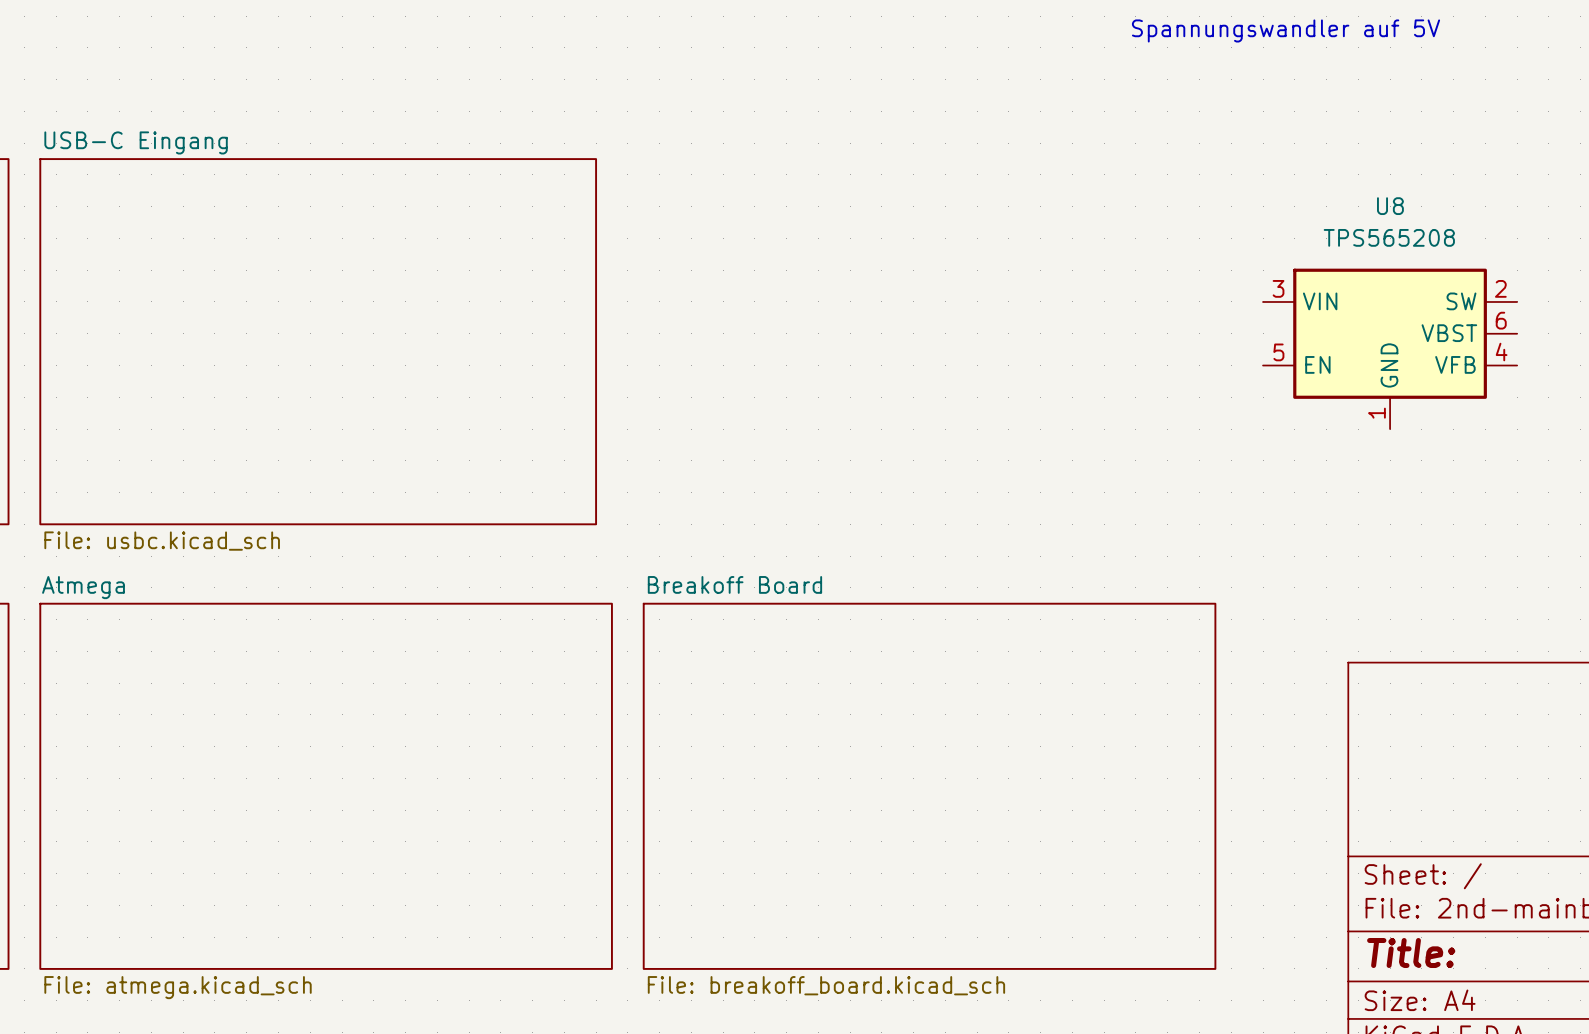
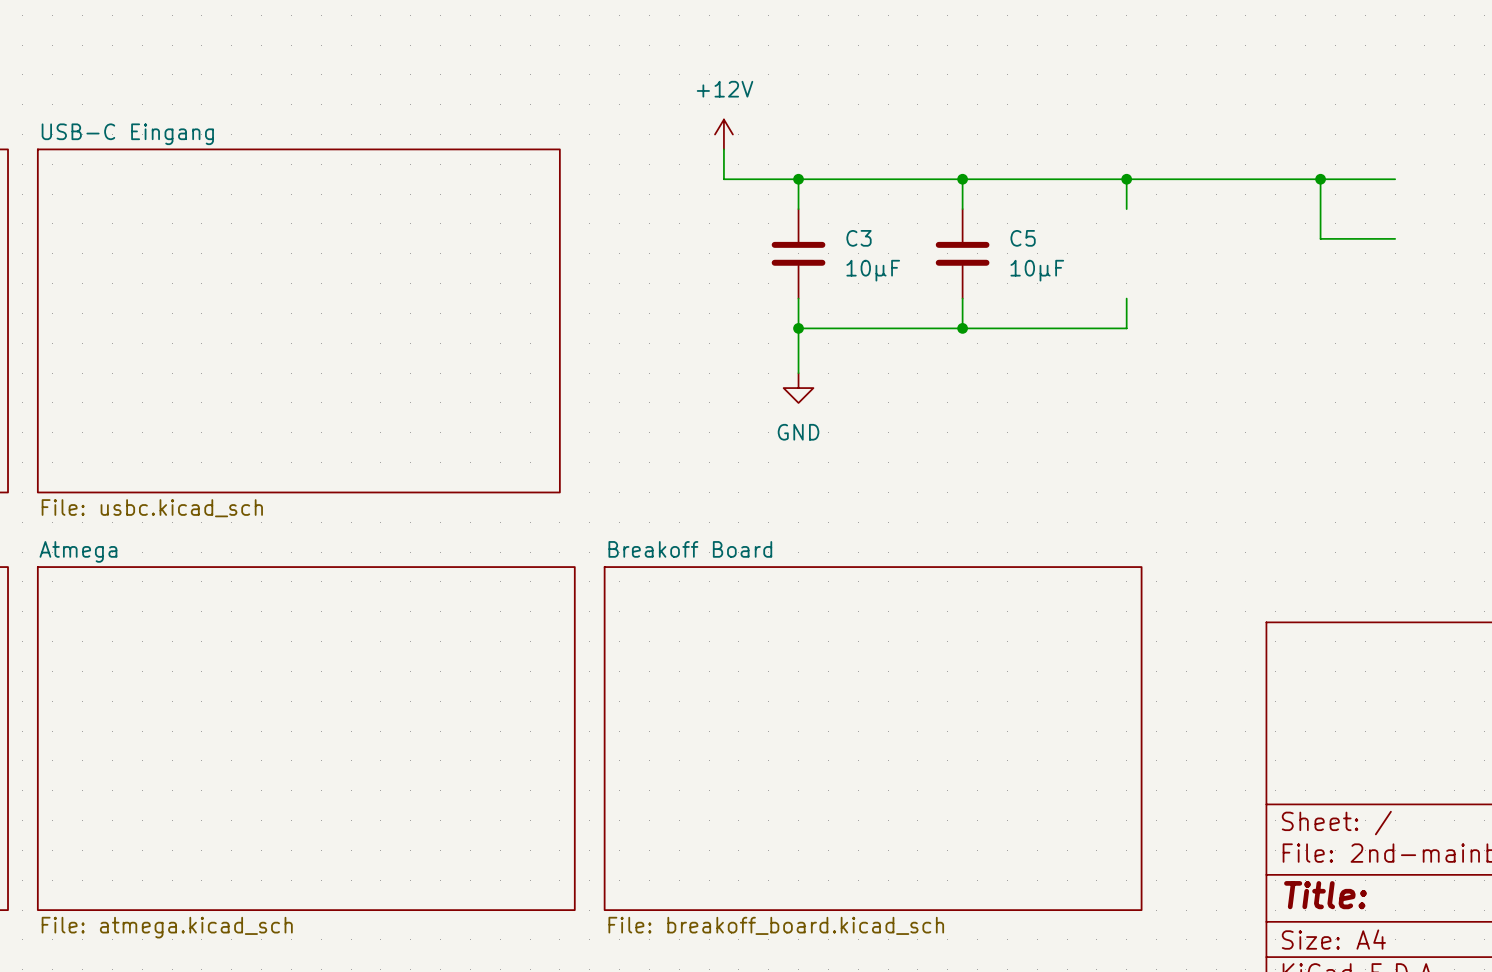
text: Spannungswandler auf 5V (1286, 30) -> none
power symbol: none -> +12V (723, 134)
wire: none -> (723, 149) (723, 179) (1395, 179)
wire: none -> (798, 179) (798, 209)
junction: none -> (798, 179)
wire: none -> (962, 179) (962, 209)
junction: none -> (962, 179)
wire: none -> (1126, 179) (1126, 209)
junction: none -> (1126, 179)
wire: none -> (1320, 179) (1320, 238) (1395, 238)
junction: none -> (1320, 179)
C3: none -> 10µF (798, 253)
C5: none -> 10µF (962, 253)
wire: none -> (798, 298) (798, 373)
wire: none -> (962, 298) (962, 328)
wire: none -> (1126, 298) (1126, 328) (798, 328)
U8: TPS565208 (1390, 348) -> none
junction: none -> (798, 328)
junction: none -> (962, 328)
power symbol: none -> GND (798, 388)

